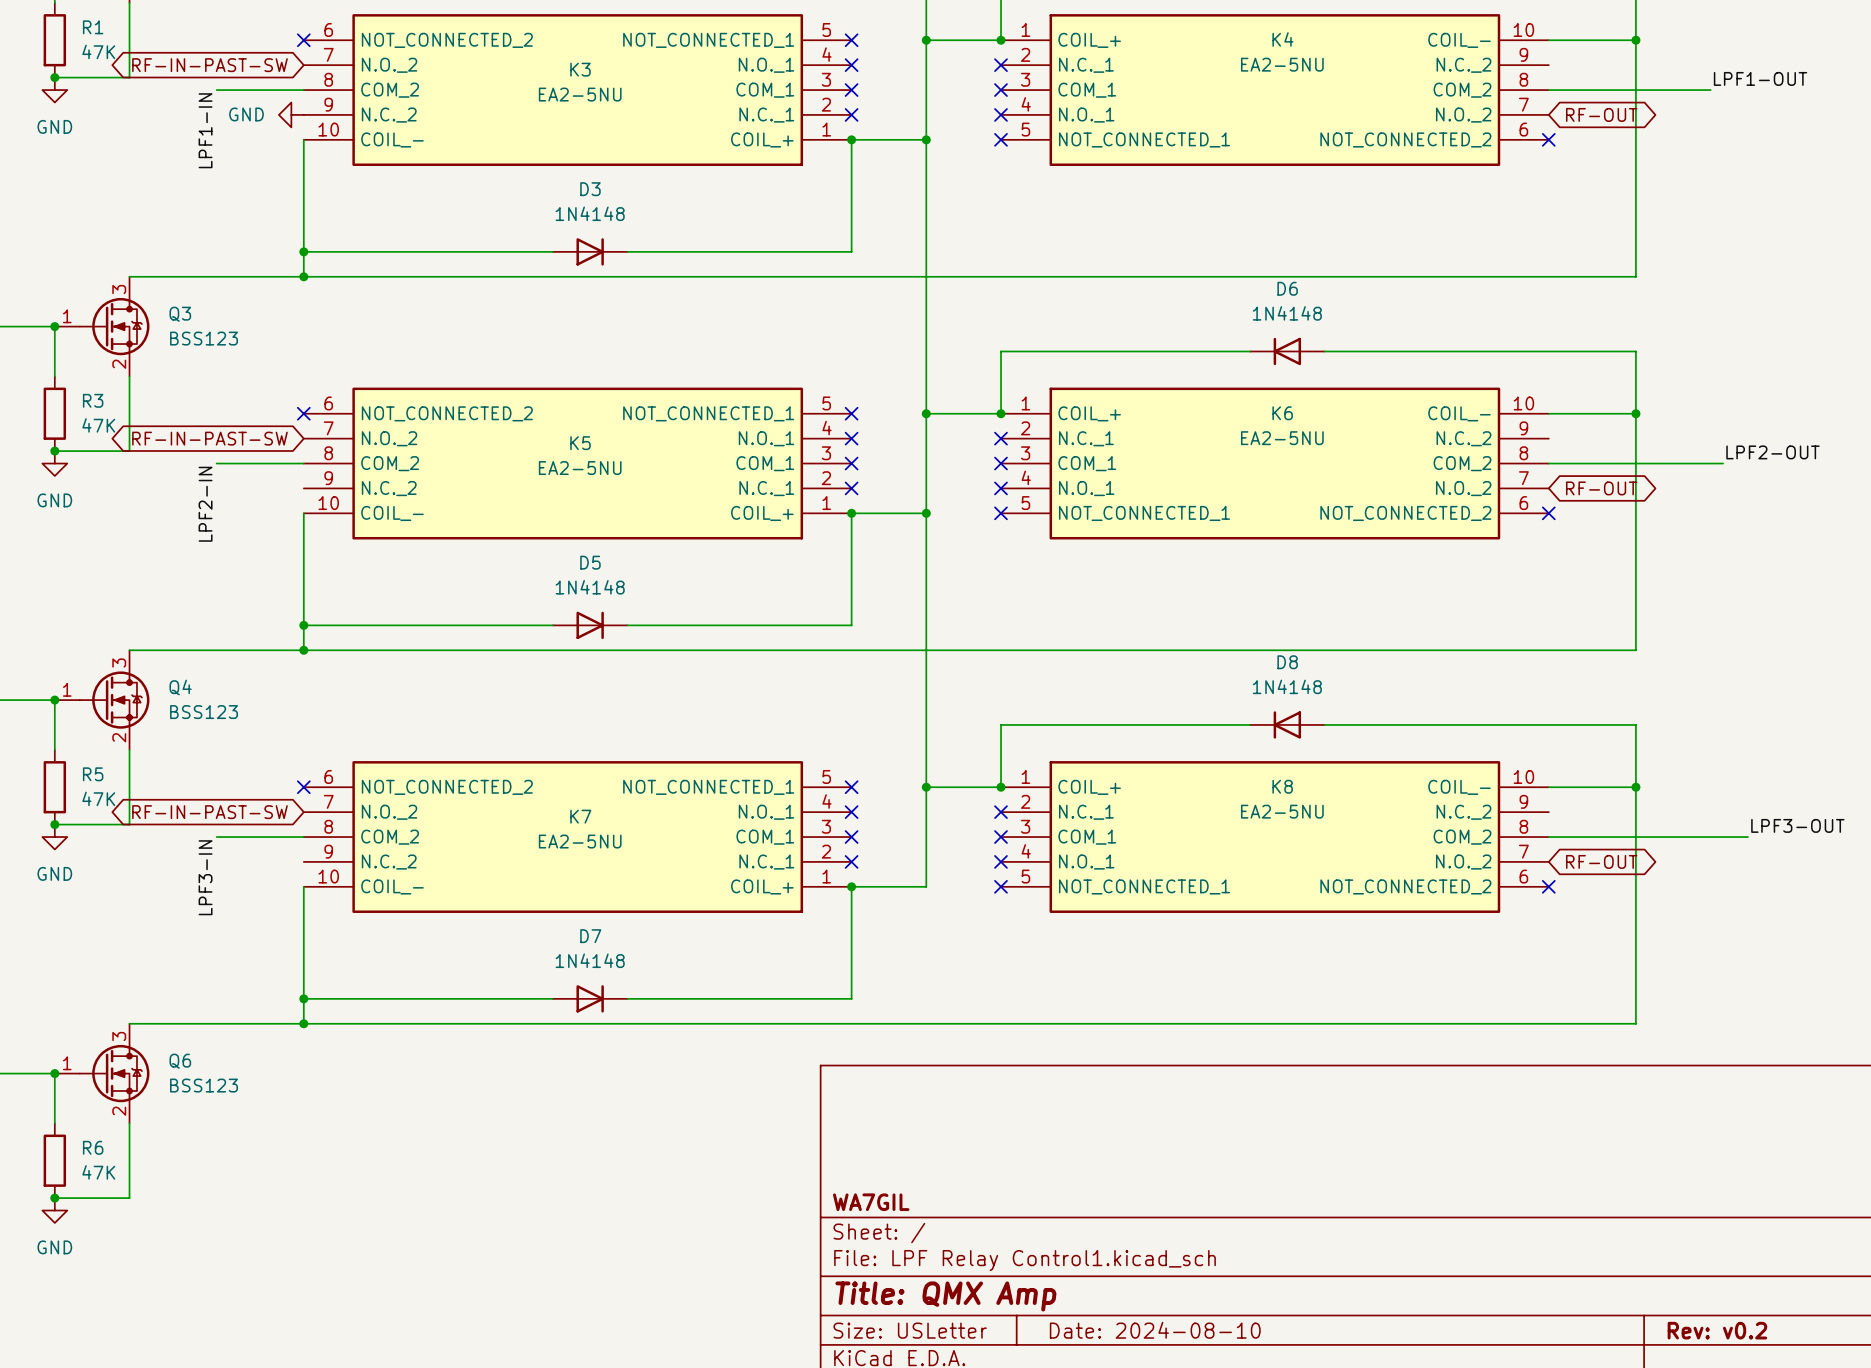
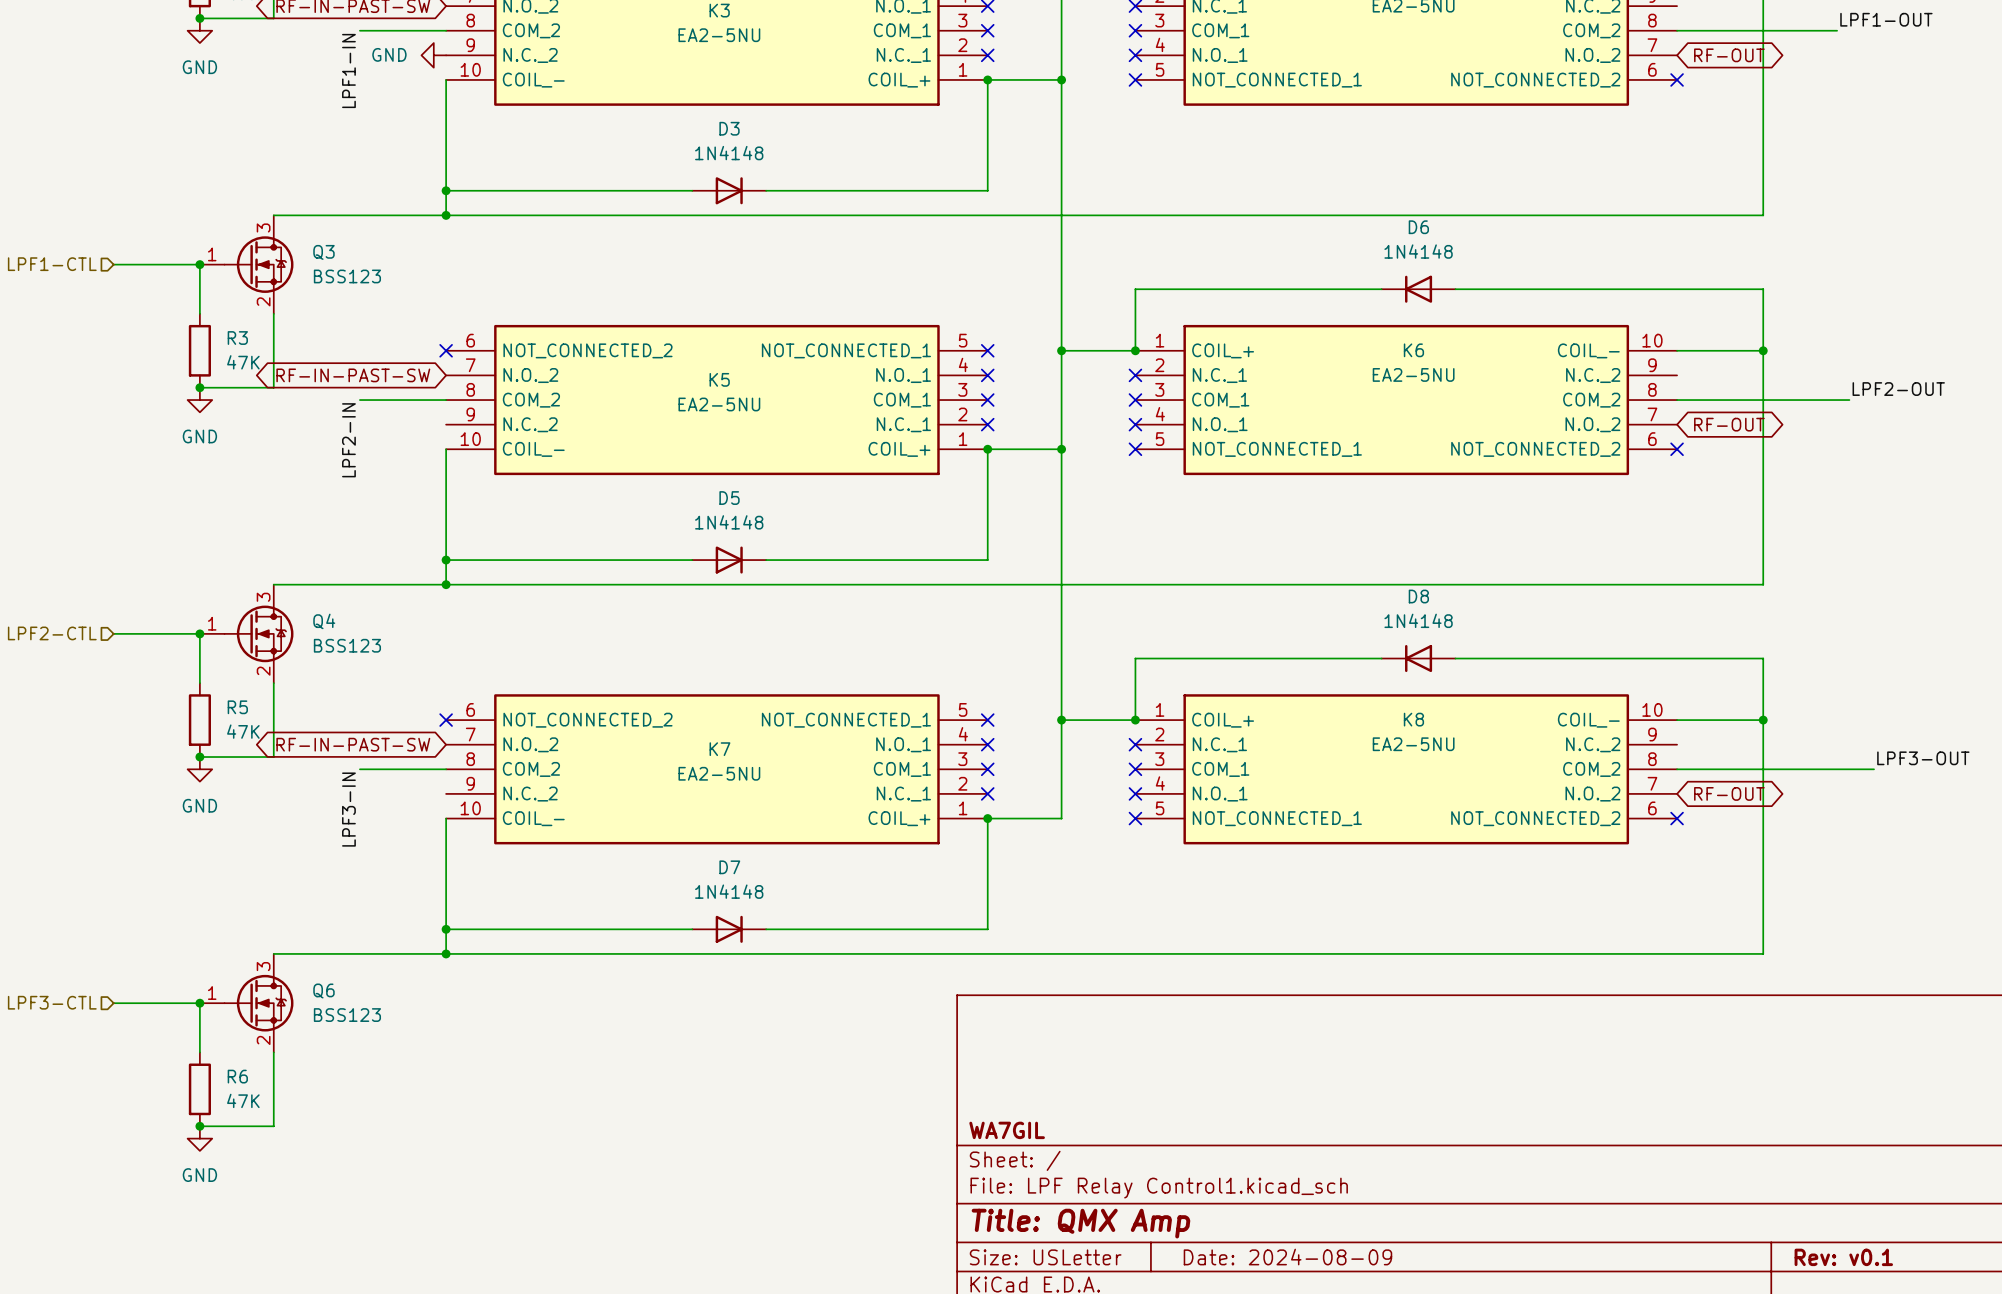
title block: Date: 2024-08-10 (1155, 1330) -> Date: 2024-08-09 (1287, 1257)
title block: Rev: v0.2 (1717, 1330) -> Rev: v0.1 (1843, 1257)

